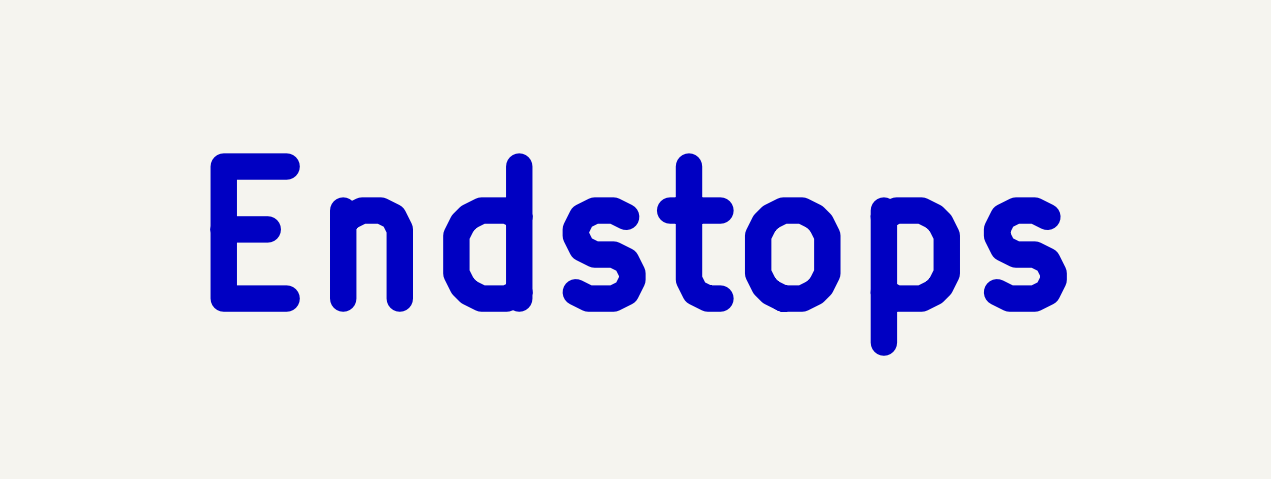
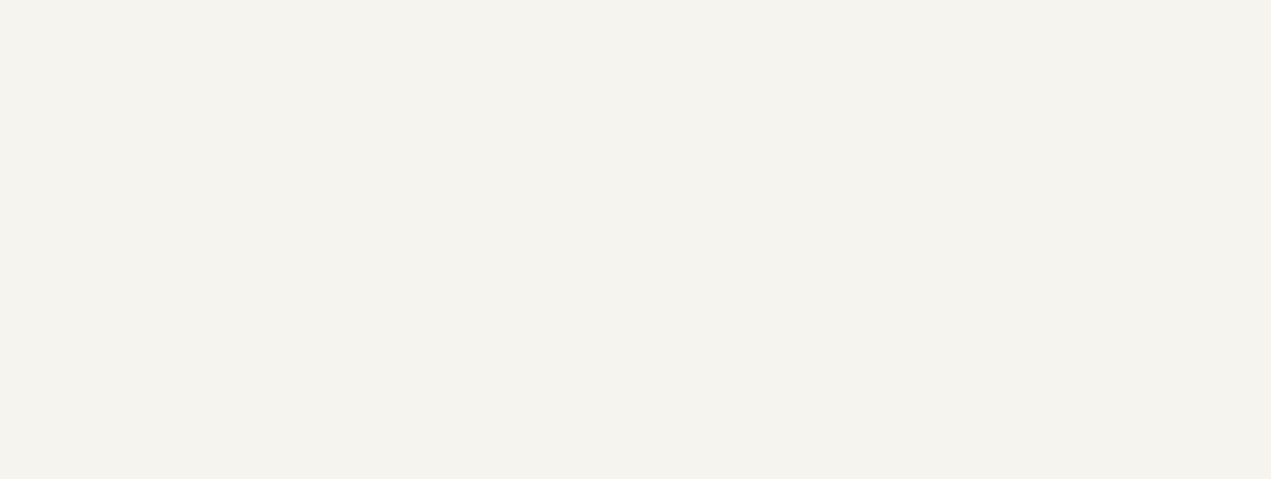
text: Endstops (638, 254) -> none

